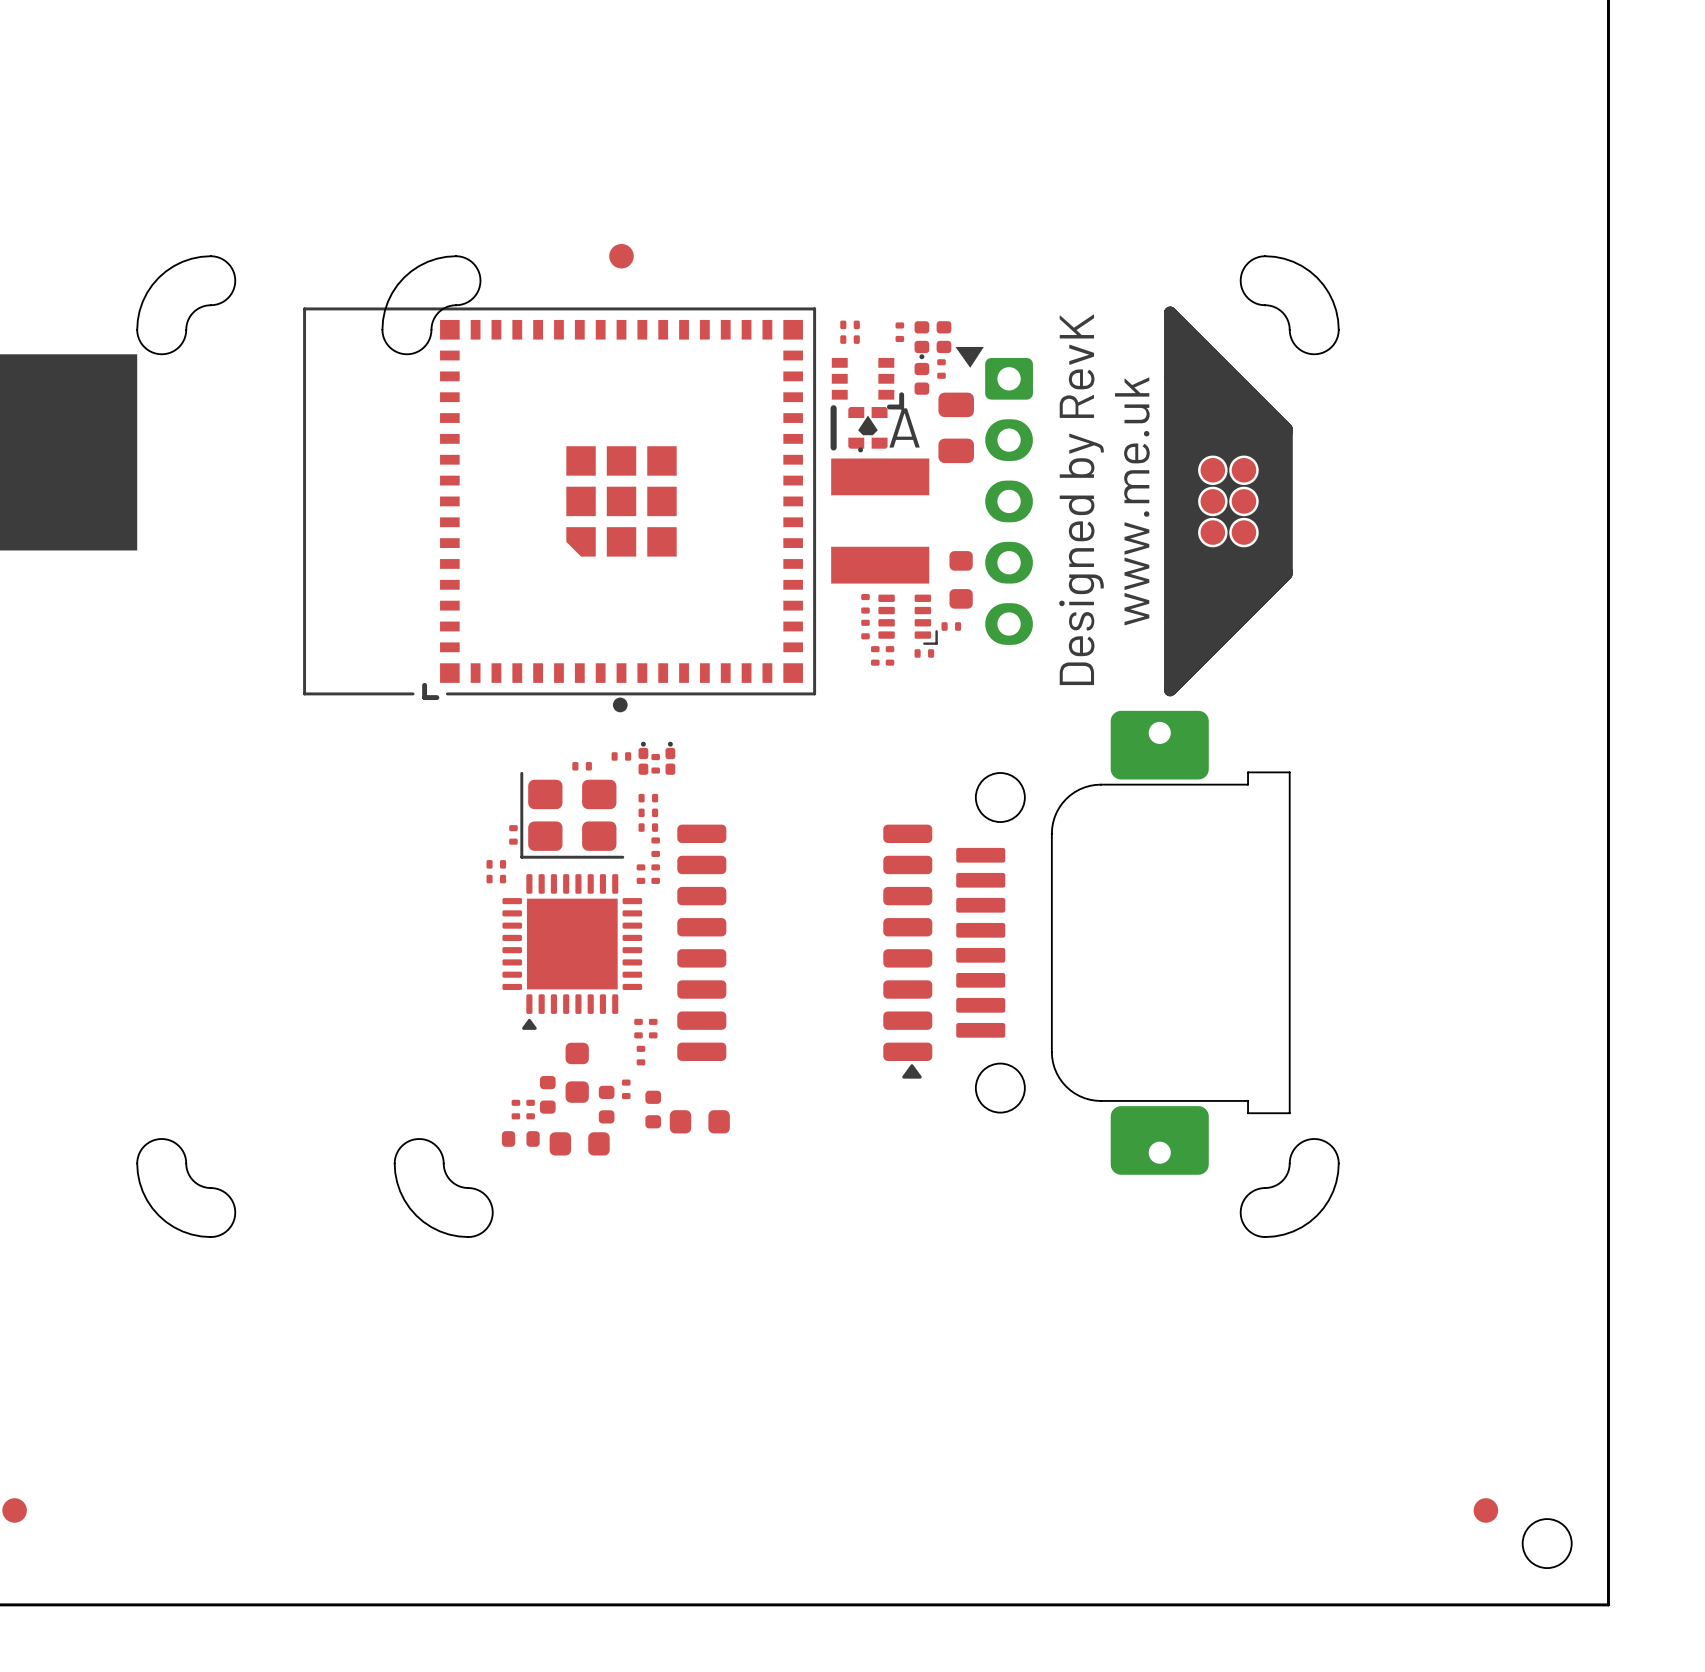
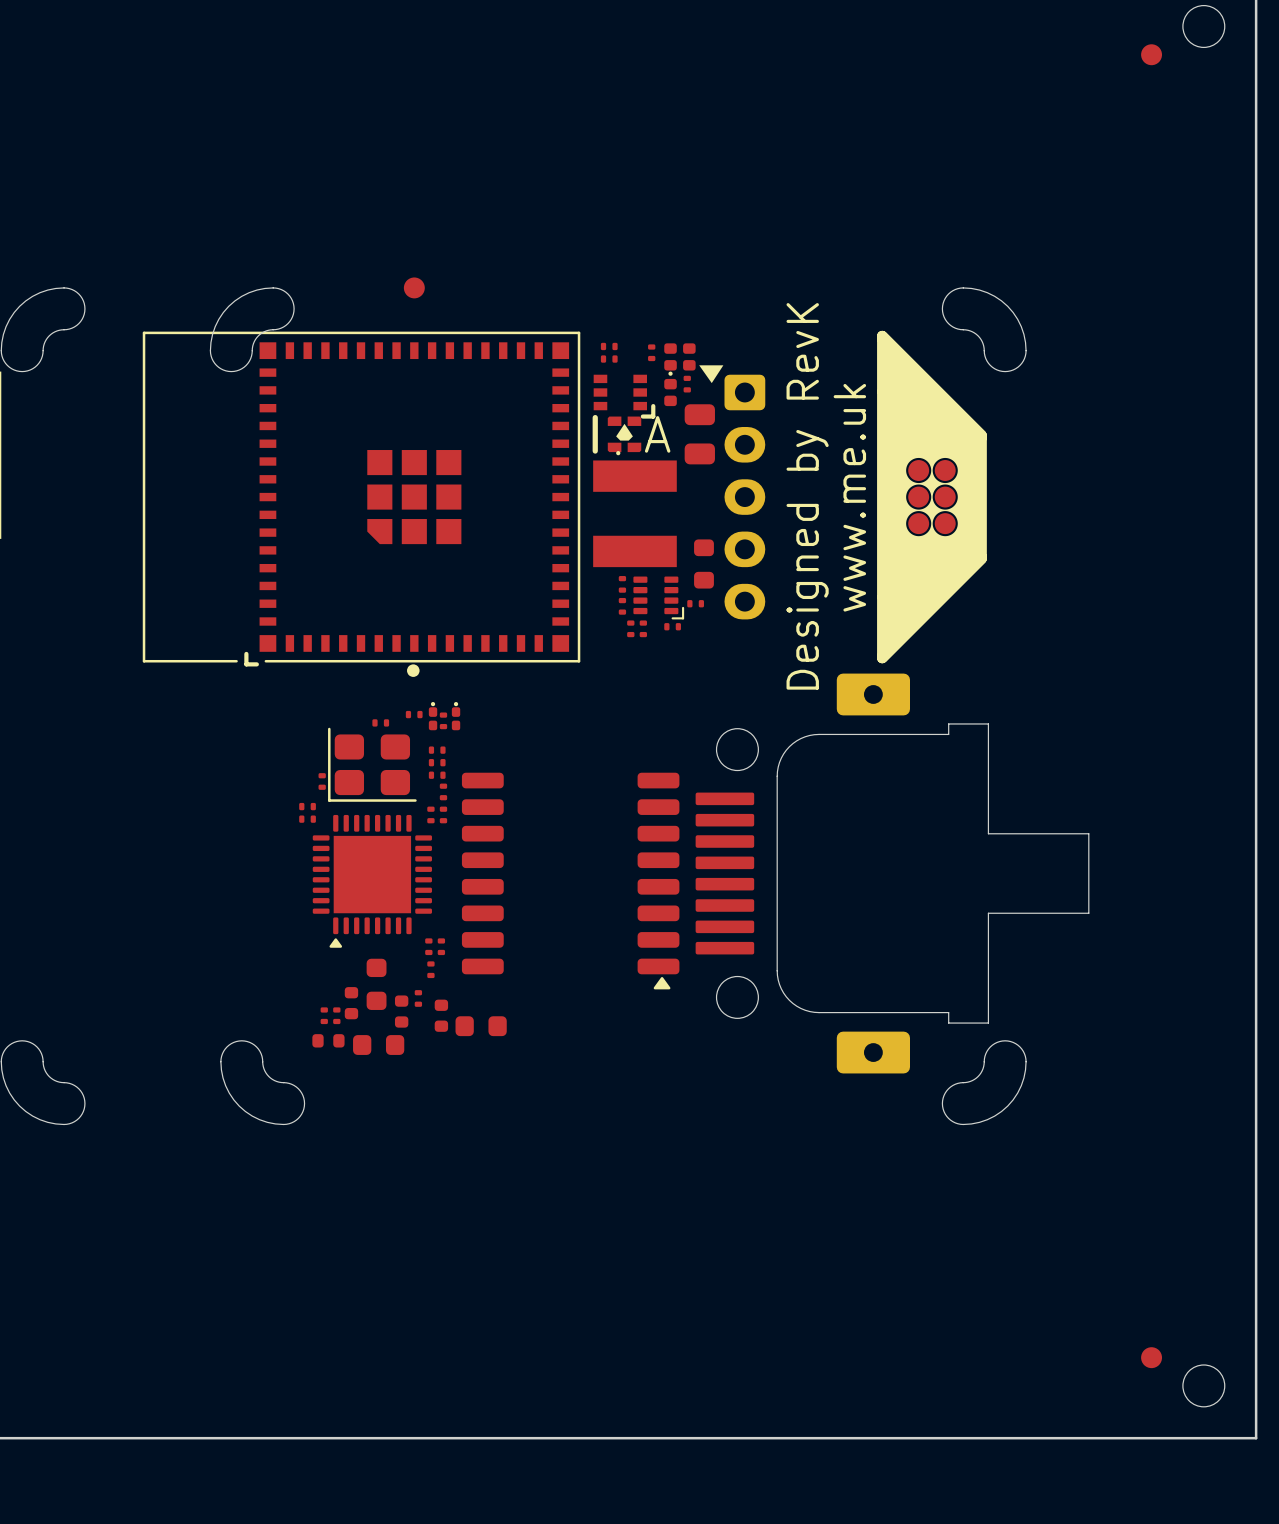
part: (1123, 942) -> none
part: none -> (892, 873)

